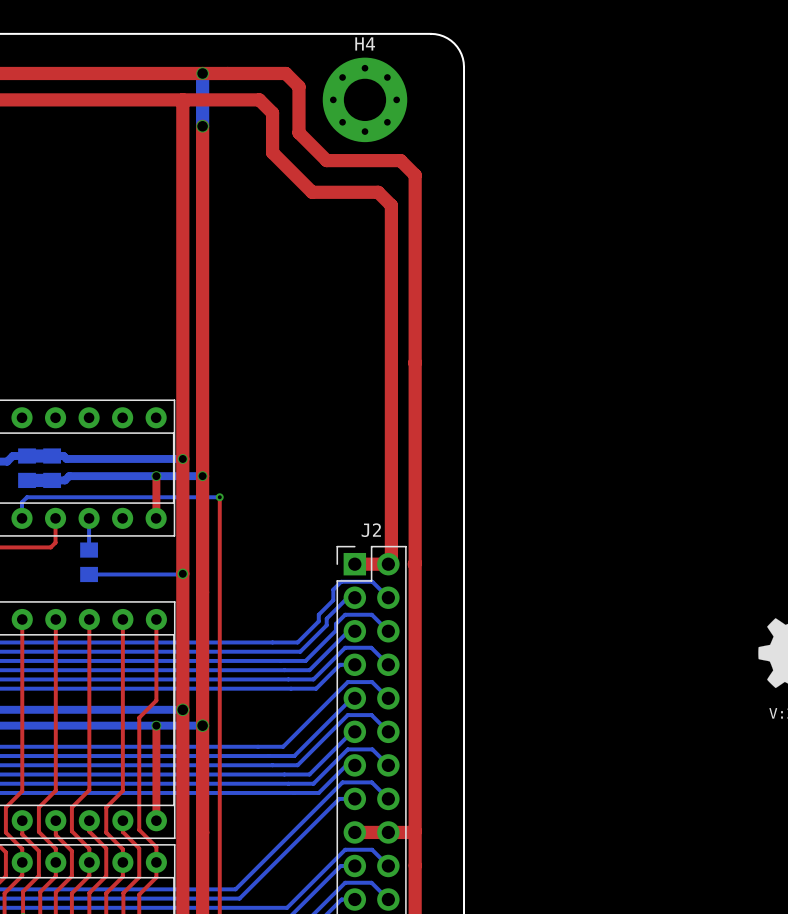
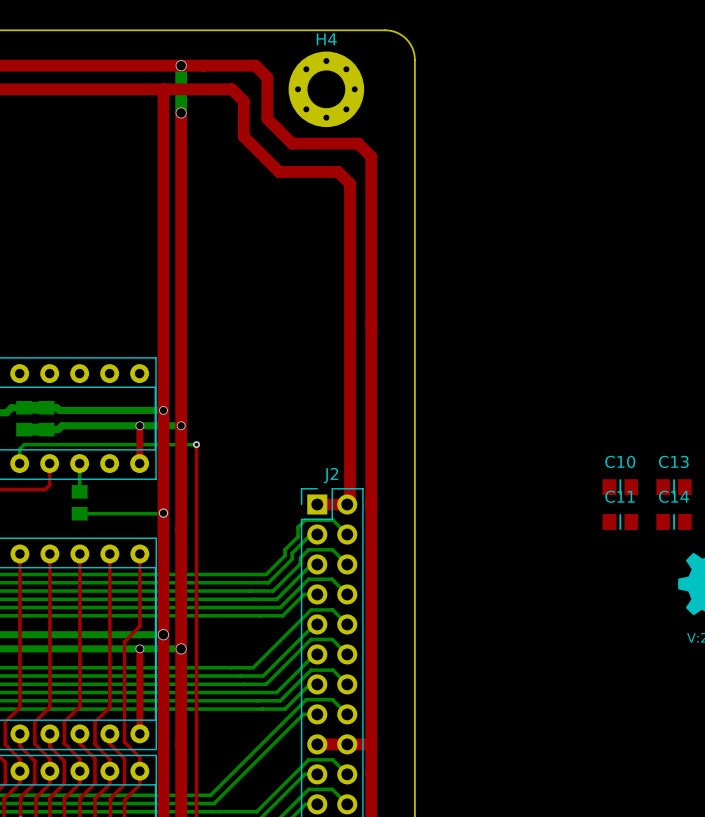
C10: none -> (620, 487)
C13: none -> (674, 487)
C11: none -> (620, 521)
C14: none -> (674, 521)

